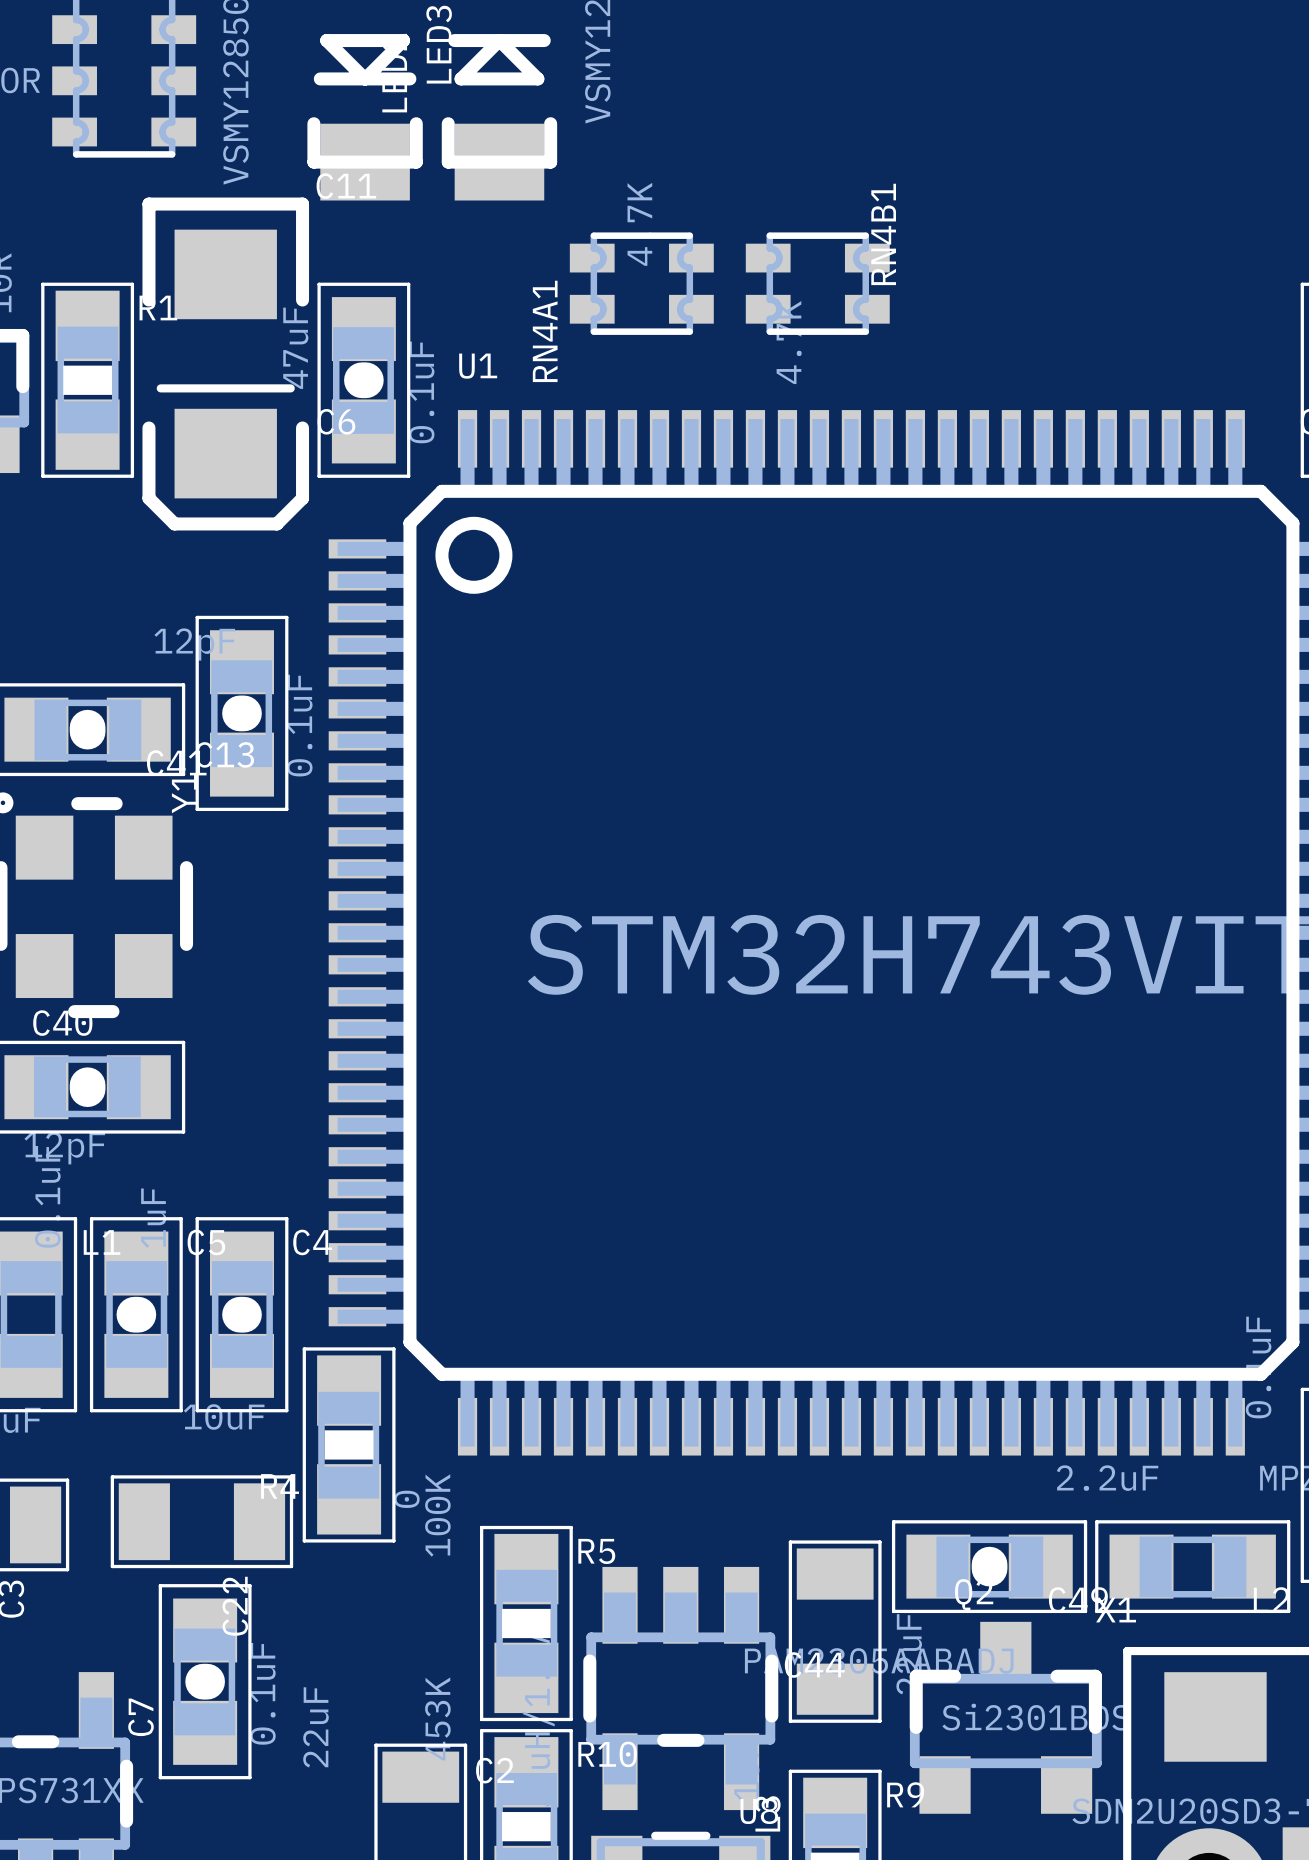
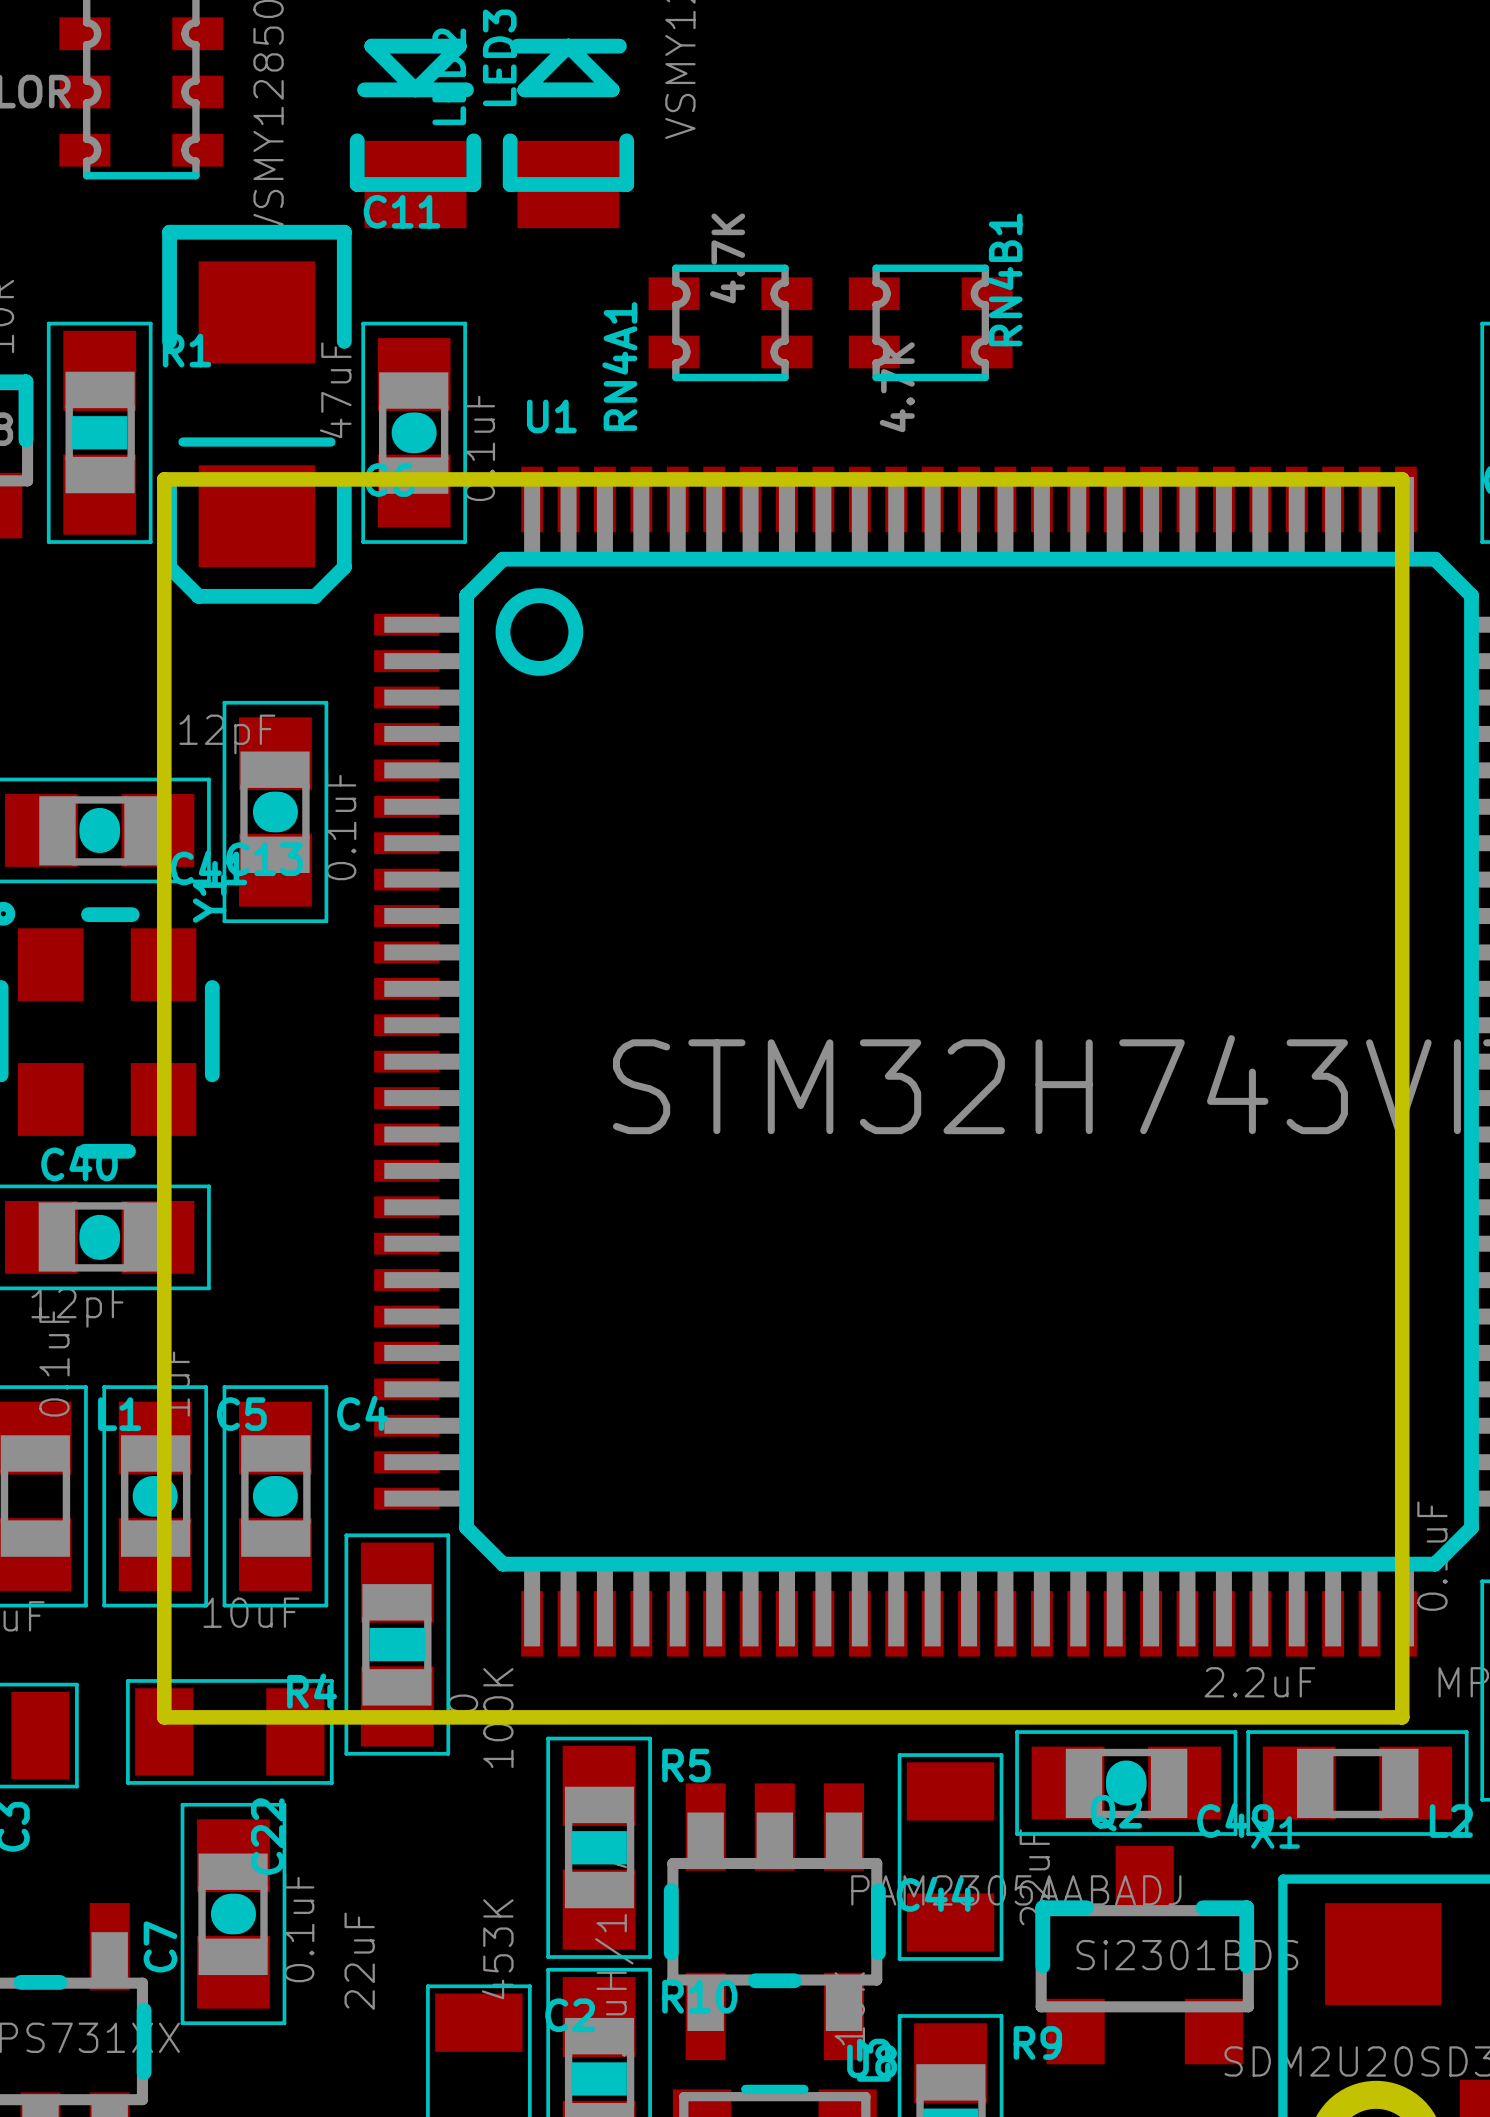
board edge: none -> (164, 479) (164, 1717) (1402, 1717) (1402, 479) (164, 479)

